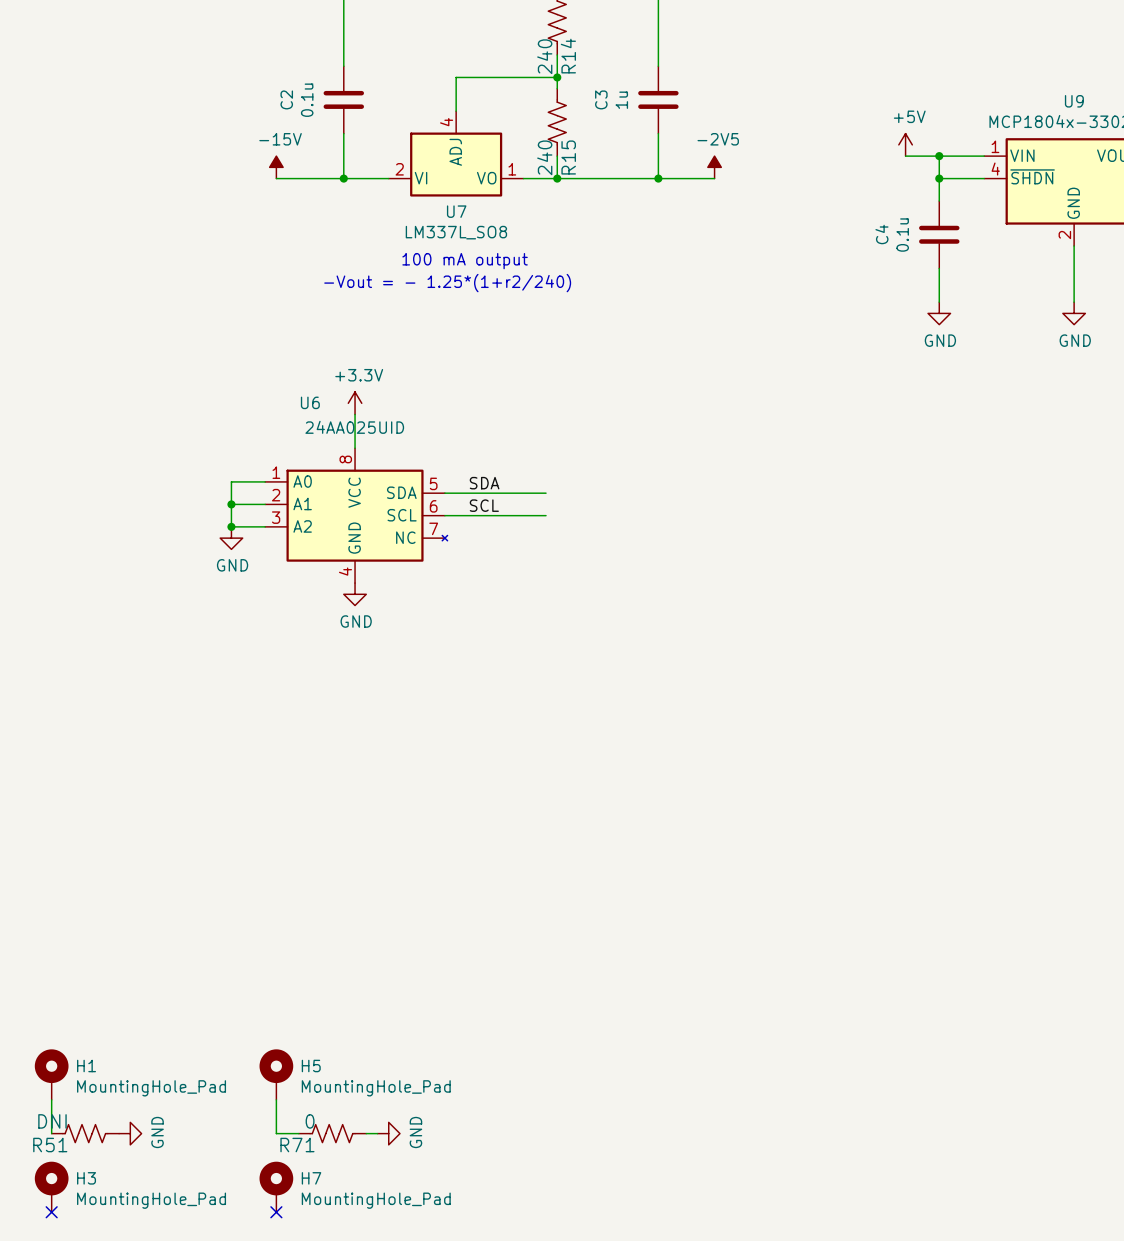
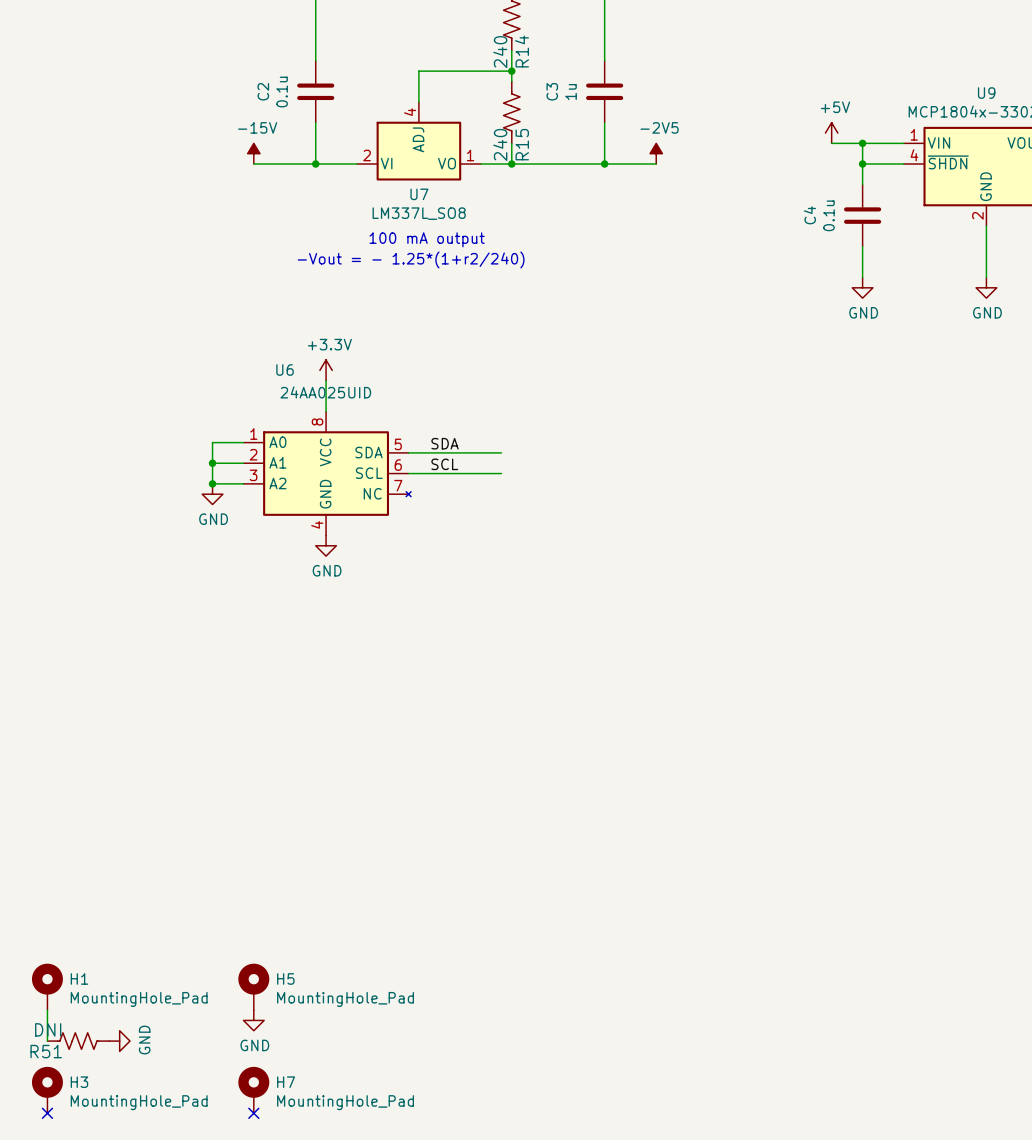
wire: (276, 1099) (276, 1133) (298, 1133) -> none
R71: 0 (332, 1133) -> none
wire: (366, 1133) (377, 1133) -> none
power symbol rotation: 0° (388, 1133) -> 90° clockwise (253, 1020)
power symbol position: GND (388, 1133) -> GND (253, 1020)

